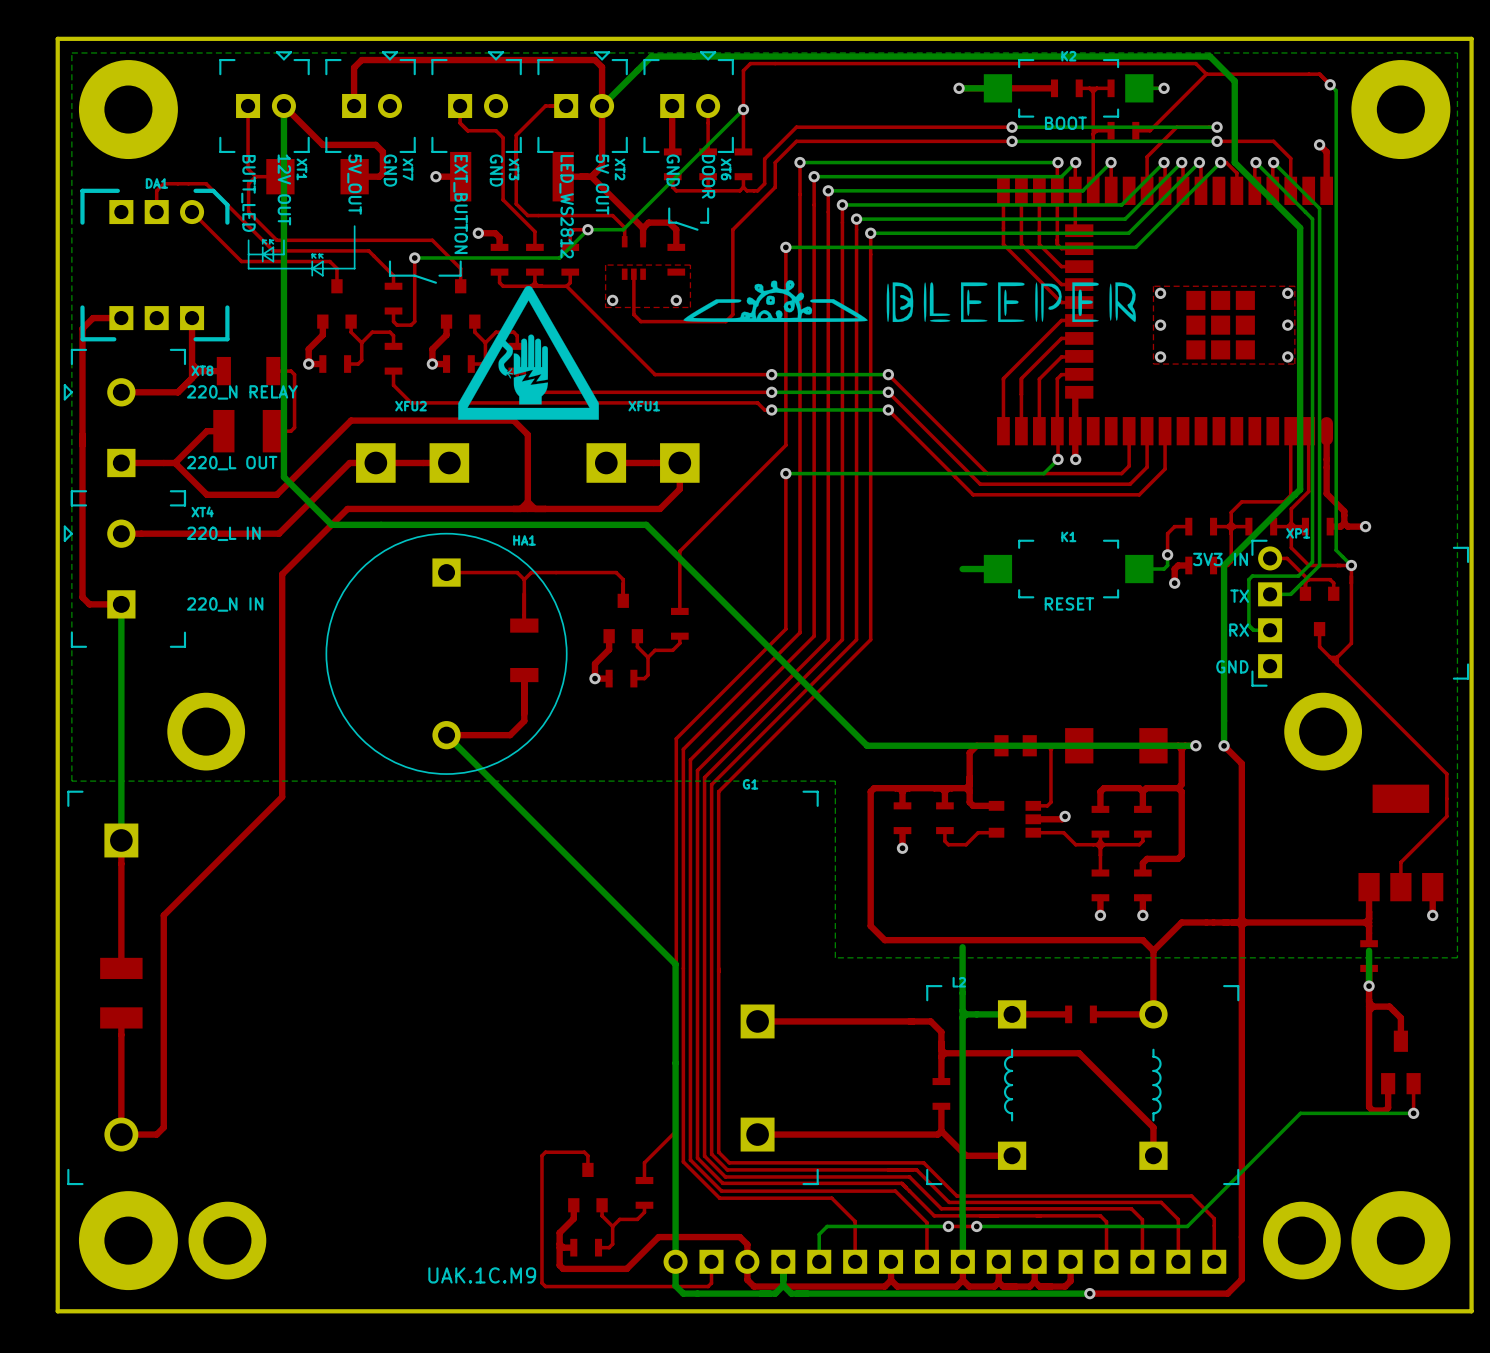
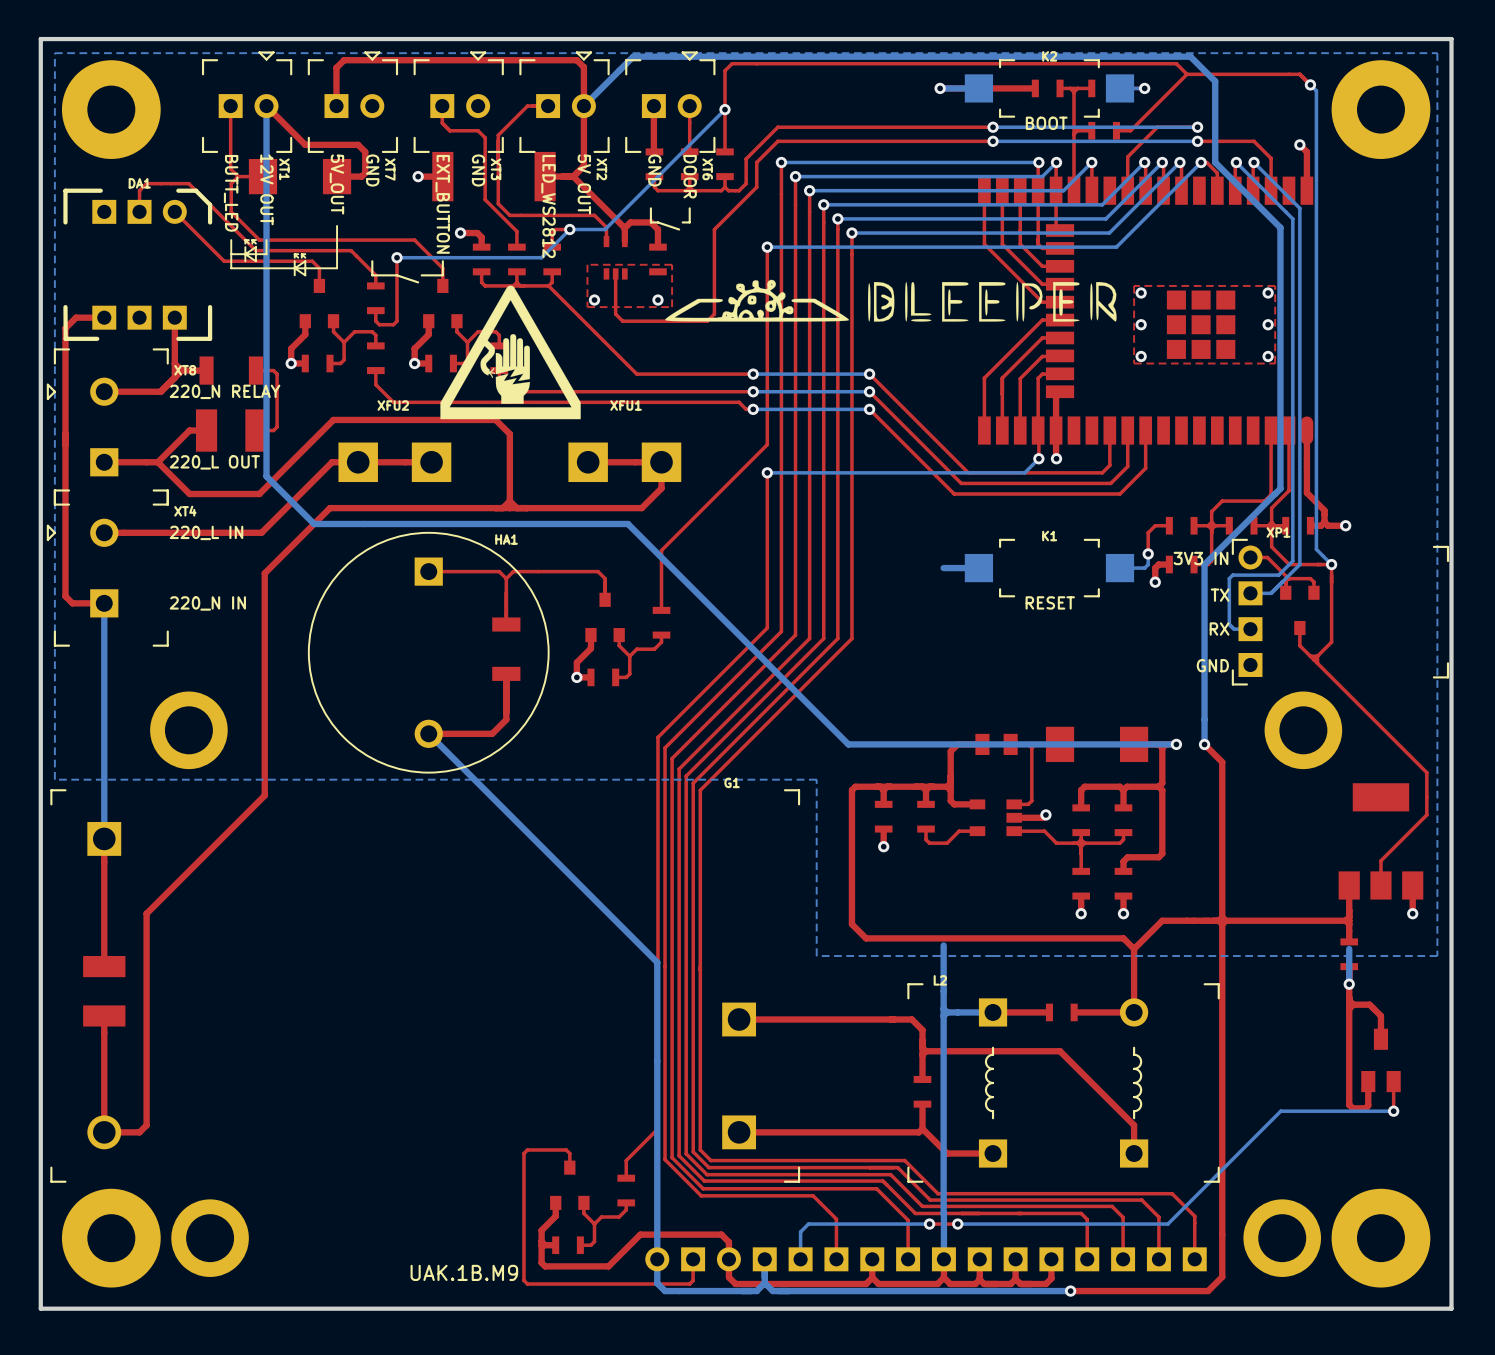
text: UAK.1С.M9 (482, 1275) -> UAK.1B.M9 (464, 1272)

